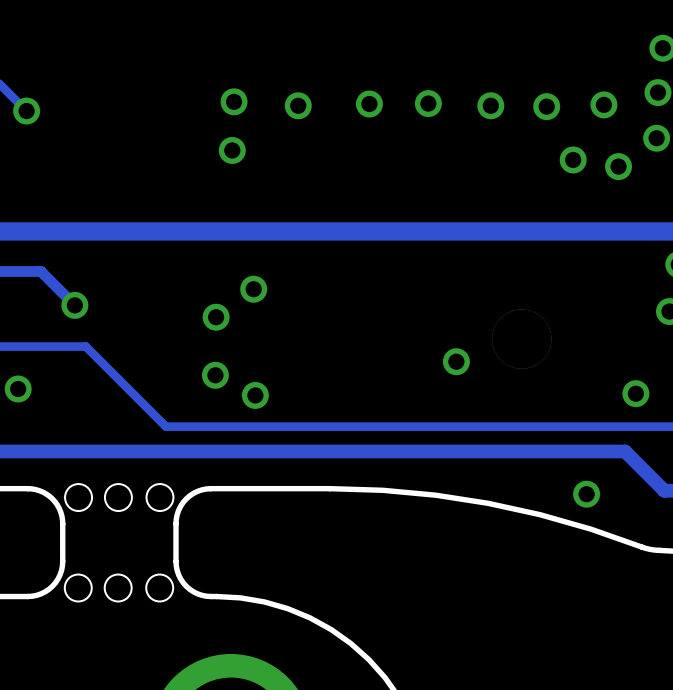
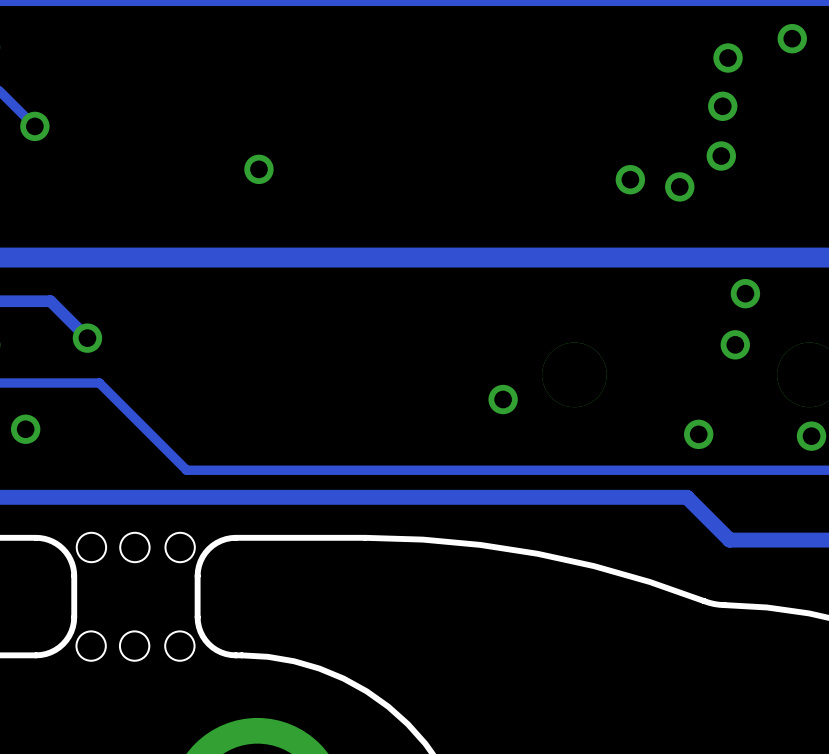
via: (234, 101) -> none
via: (428, 103) -> none
via: (369, 104) -> none
via: (603, 104) -> none
via: (298, 105) -> none
via: (490, 105) -> none
via: (546, 106) -> none
via: (253, 289) -> none
via: (216, 317) -> none
via: (215, 375) -> none
via: (255, 395) -> none
via: (586, 494) -> none

